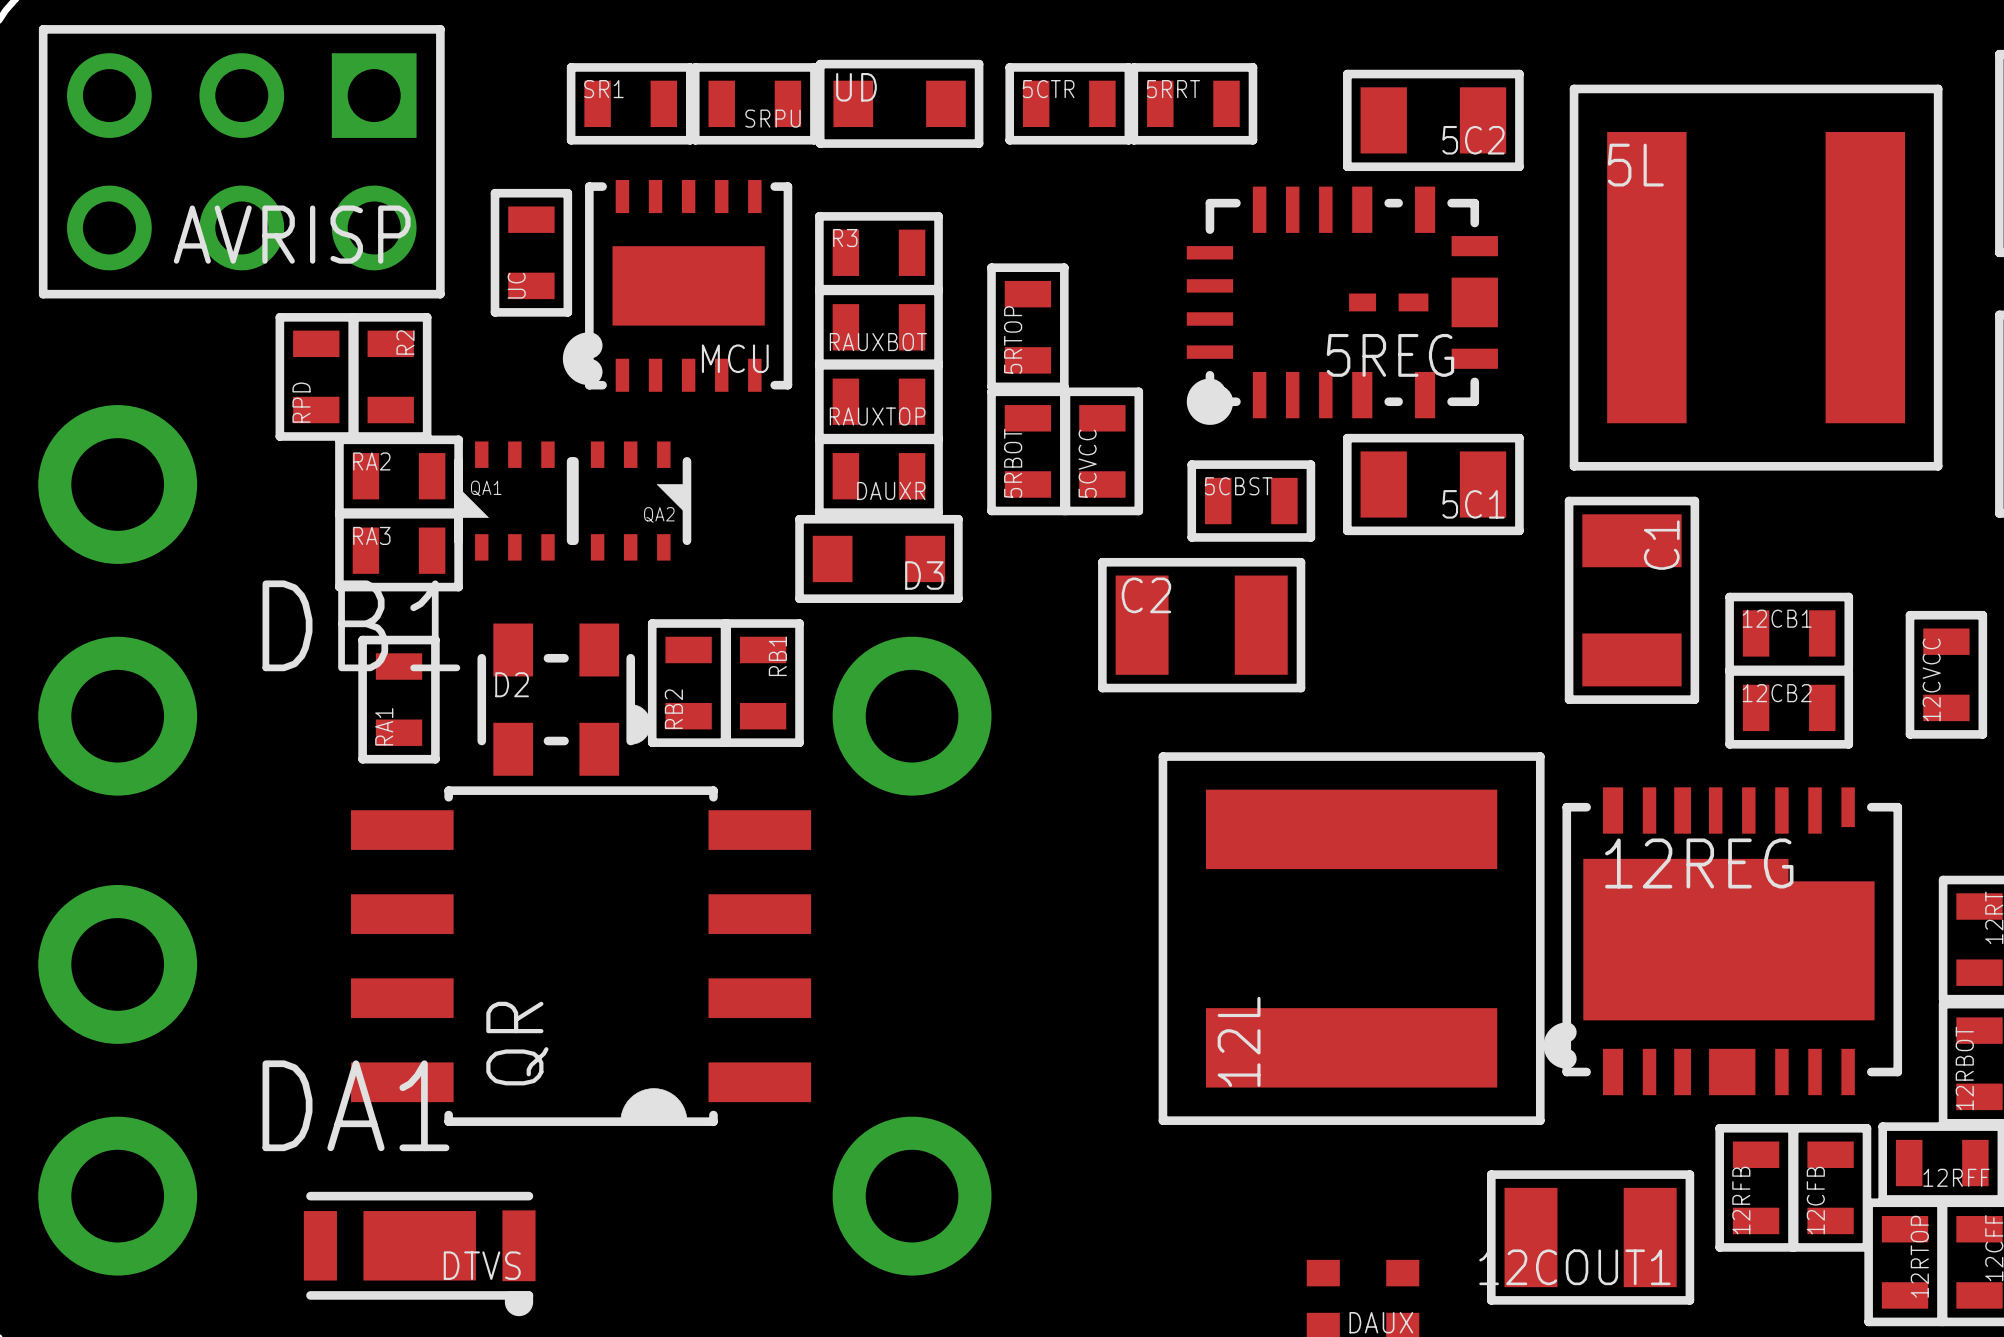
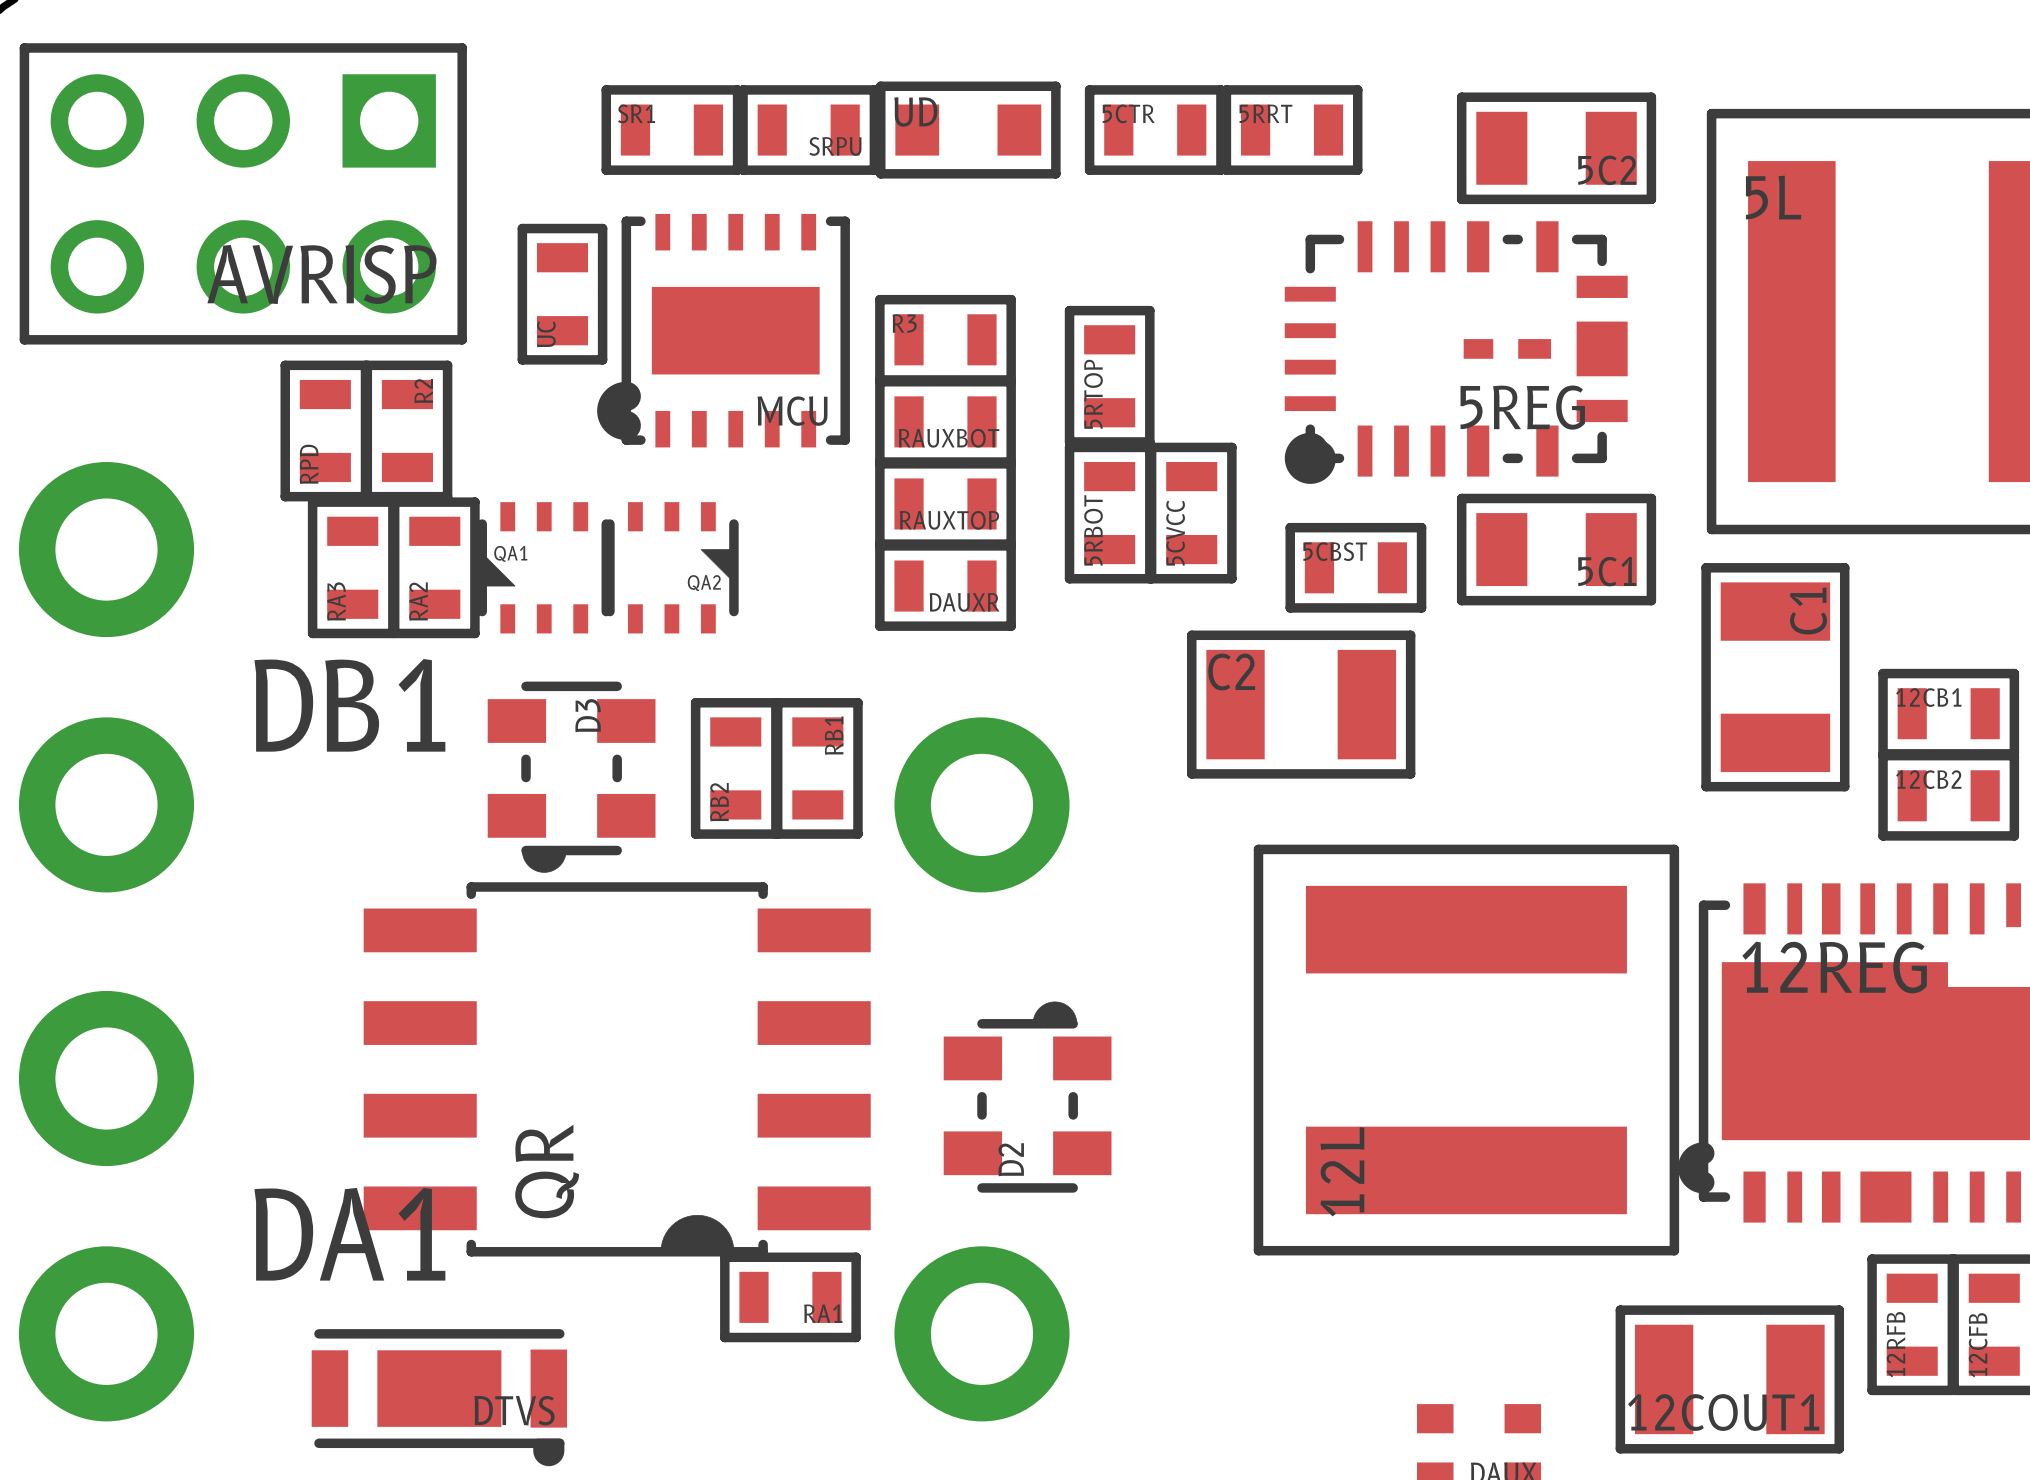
R3 position: (878, 252) -> (945, 339)
RAUXBOT position: (878, 327) -> (945, 421)
RAUXTOP position: (878, 401) -> (945, 503)
RA2 rotation: 0° (399, 476) -> 90° clockwise (434, 567)
DAUXR position: (878, 476) -> (945, 586)
D3 footprint: [795, 514, 963, 603] -> [487, 681, 656, 873]
RA3 rotation: 0° (399, 550) -> 90° clockwise (352, 567)
RA1 rotation: 0° (399, 699) -> 90° clockwise (790, 1297)
RA1 position: (399, 699) -> (790, 1297)
D2 rotation: 0° (564, 699) -> 90° counterclockwise (1027, 1097)
D2 position: (564, 699) -> (1027, 1097)

